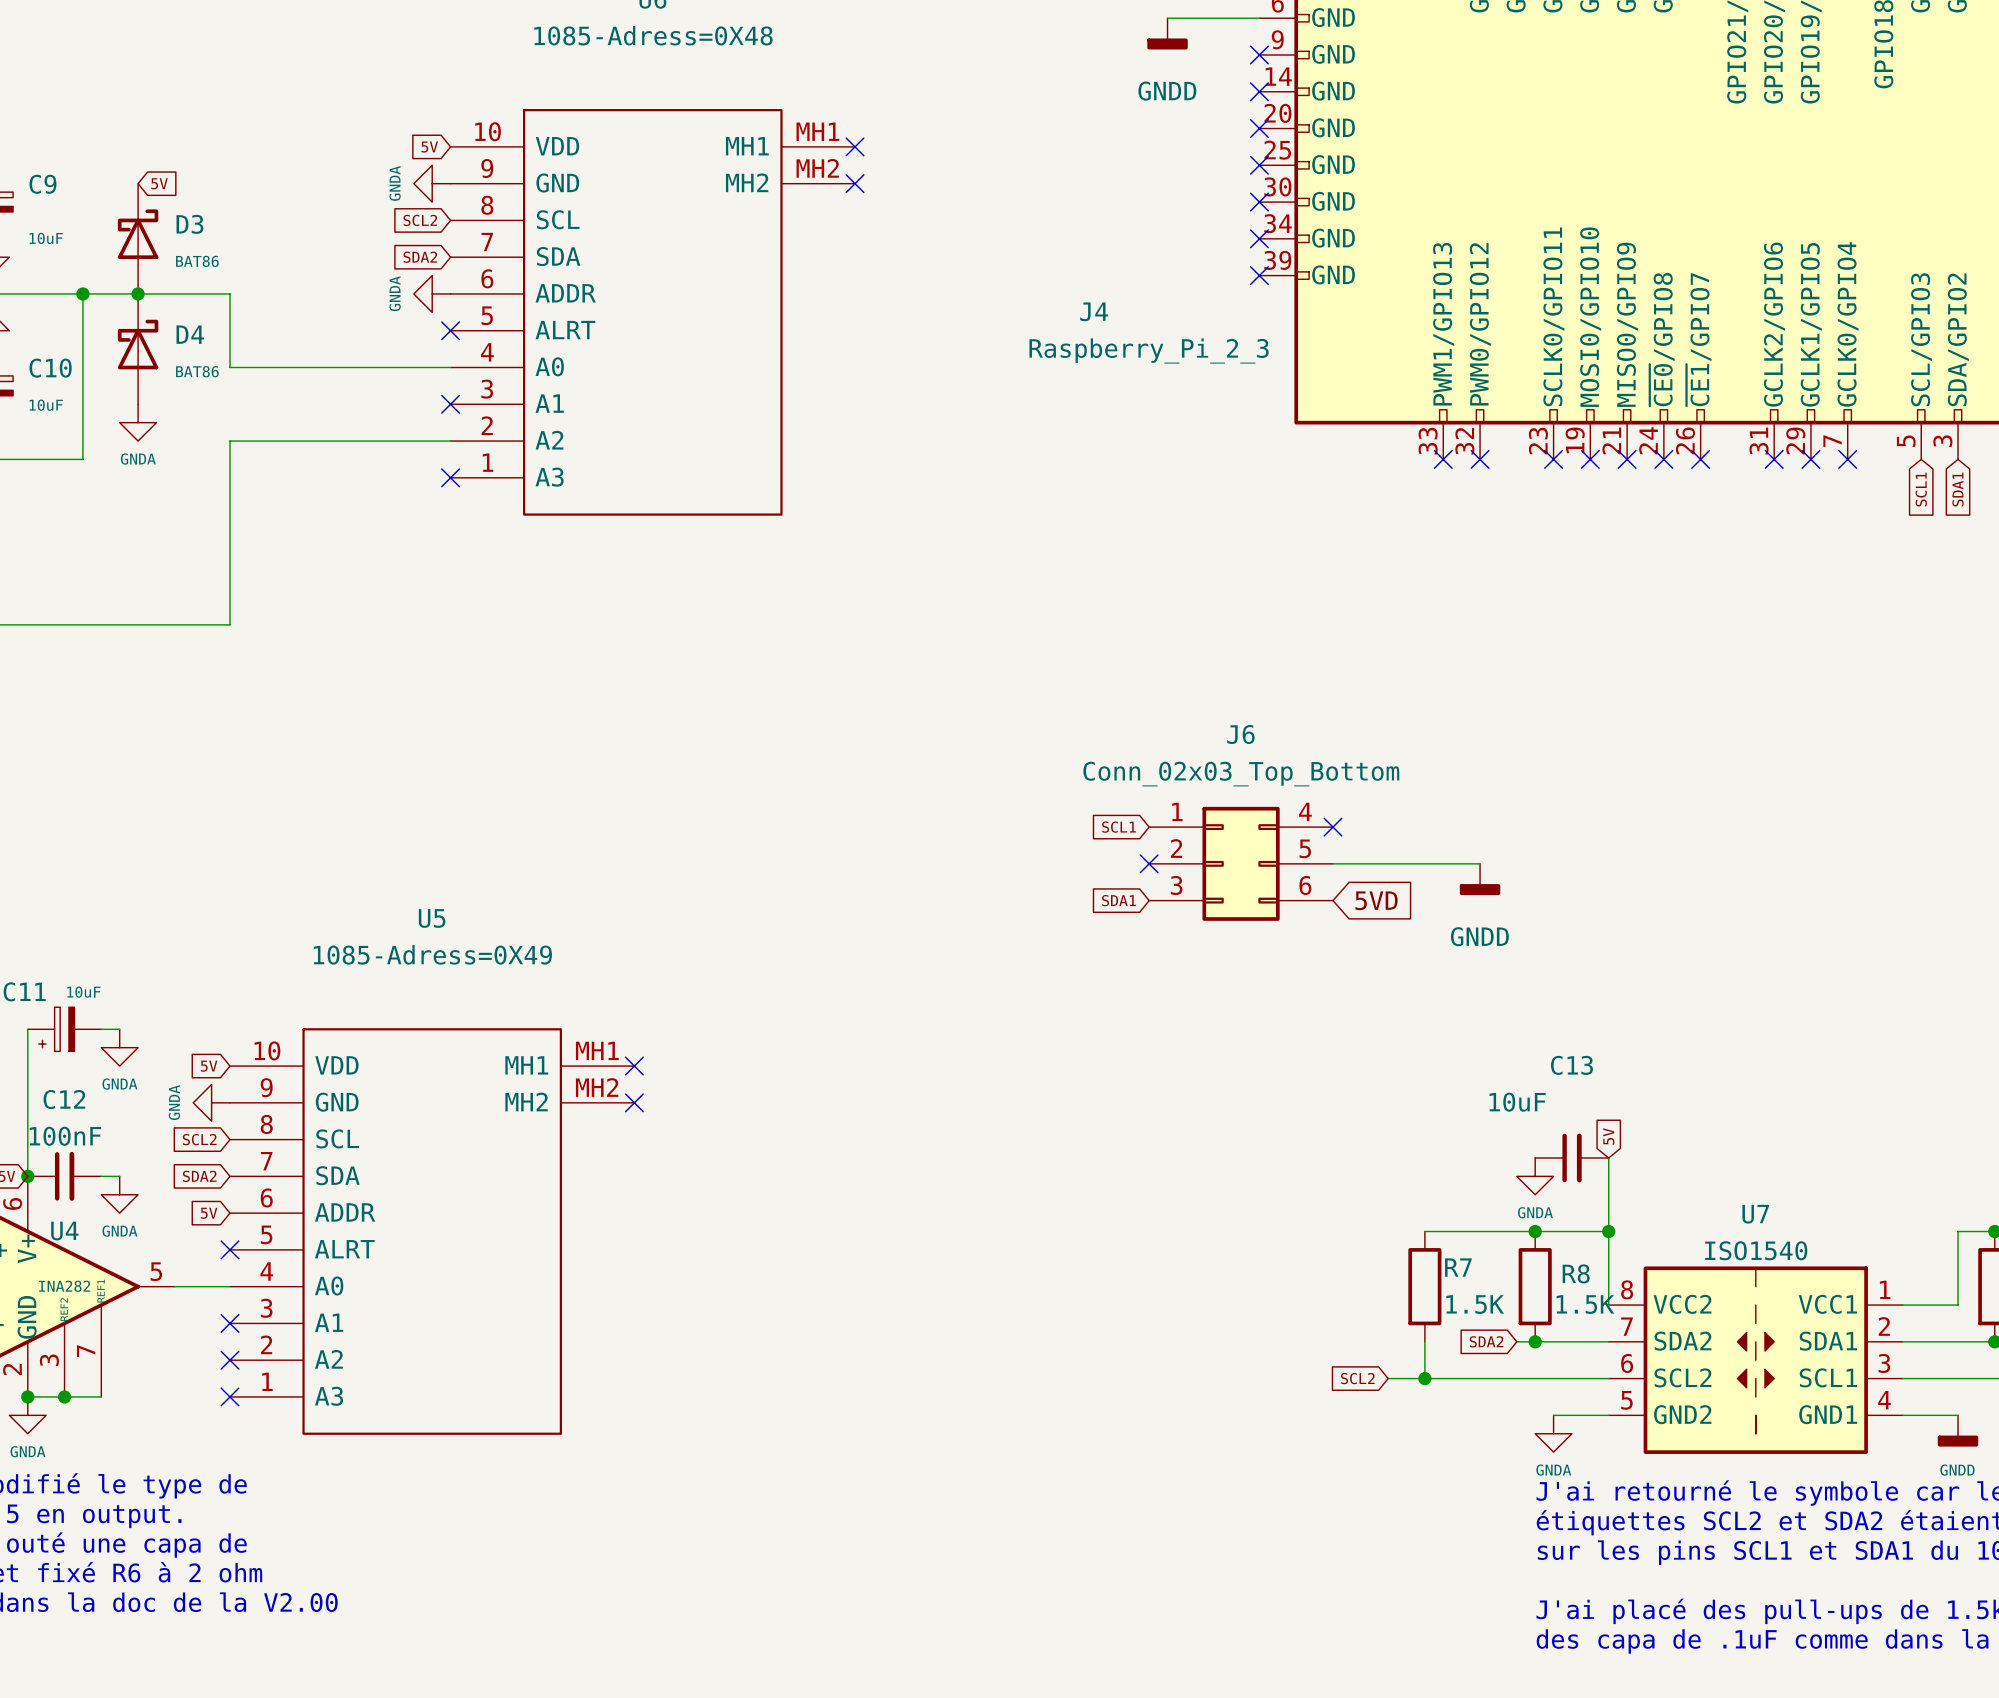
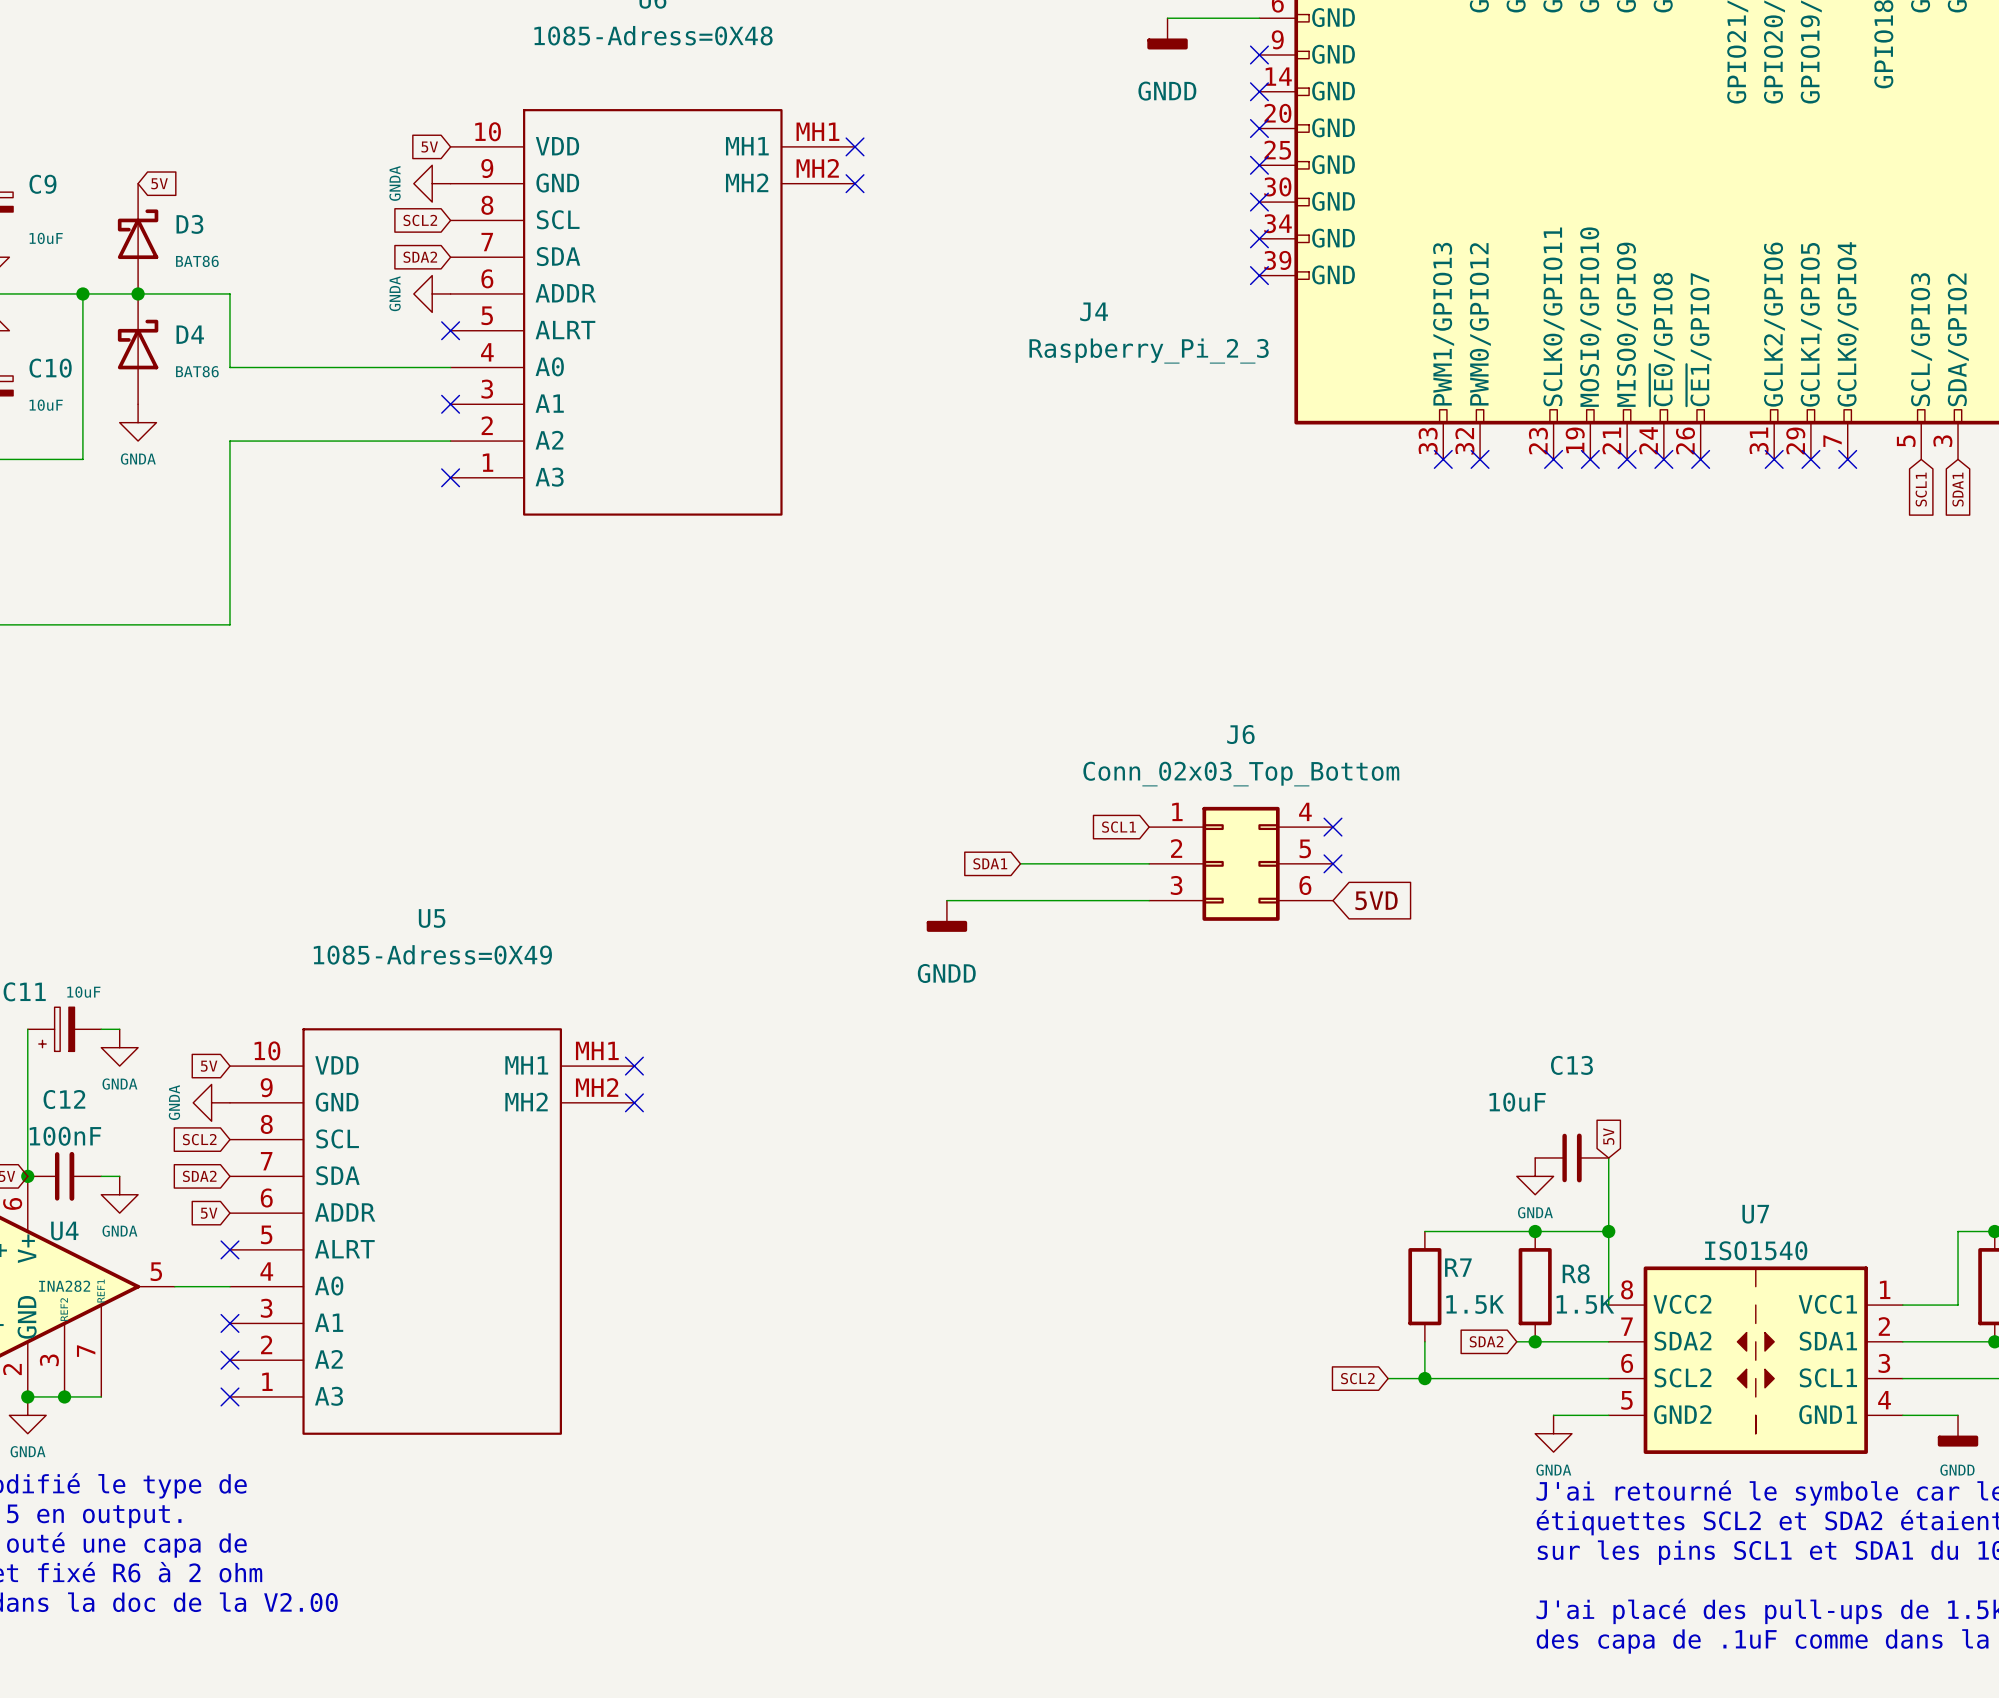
wire: none -> (1020, 863) (1149, 863)
no-connect mark: (1149, 863) -> none
wire: (1332, 863) (1480, 863) -> none
no-connect mark: none -> (1332, 863)
power symbol: GNDD (1480, 879) -> none
wire: none -> (946, 900) (1149, 900)
global label position: SDA1 (1119, 900) -> SDA1 (990, 863)
power symbol: none -> GNDD (946, 916)

